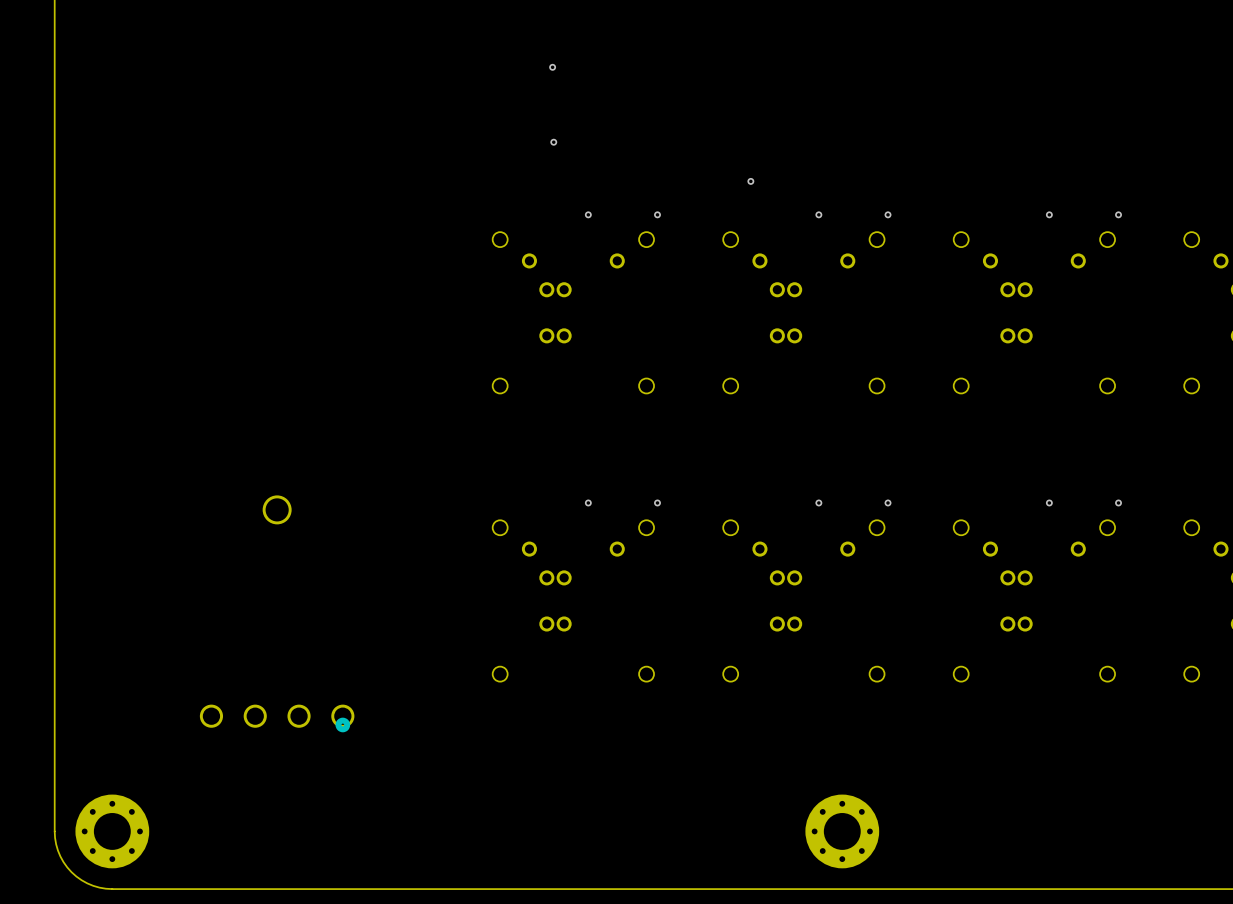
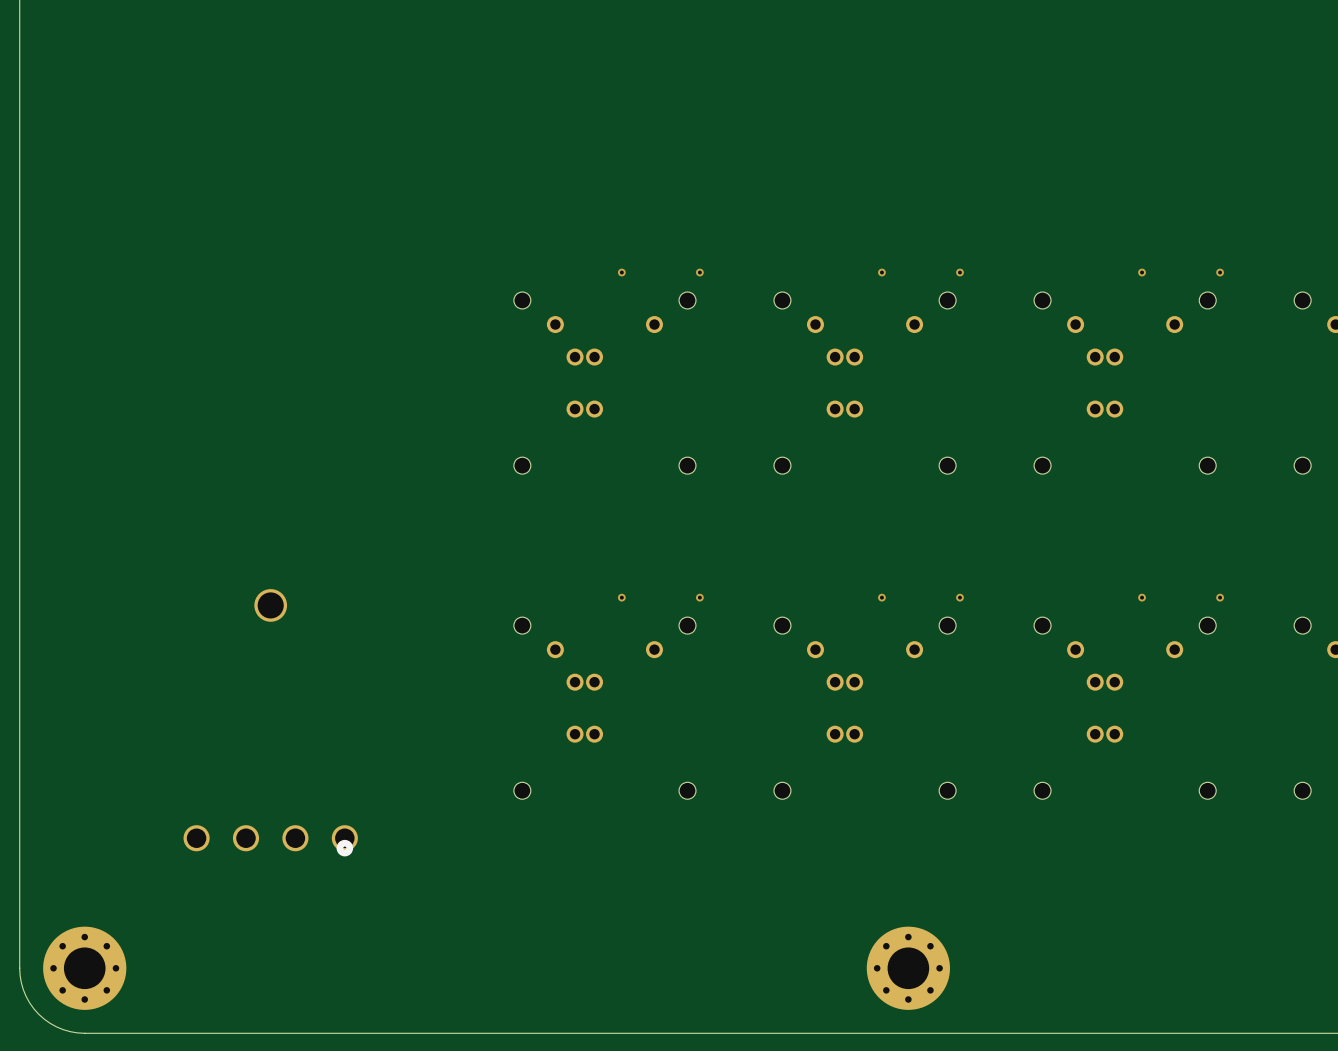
via: (552, 67) -> none
via: (553, 142) -> none
via: (750, 181) -> none

